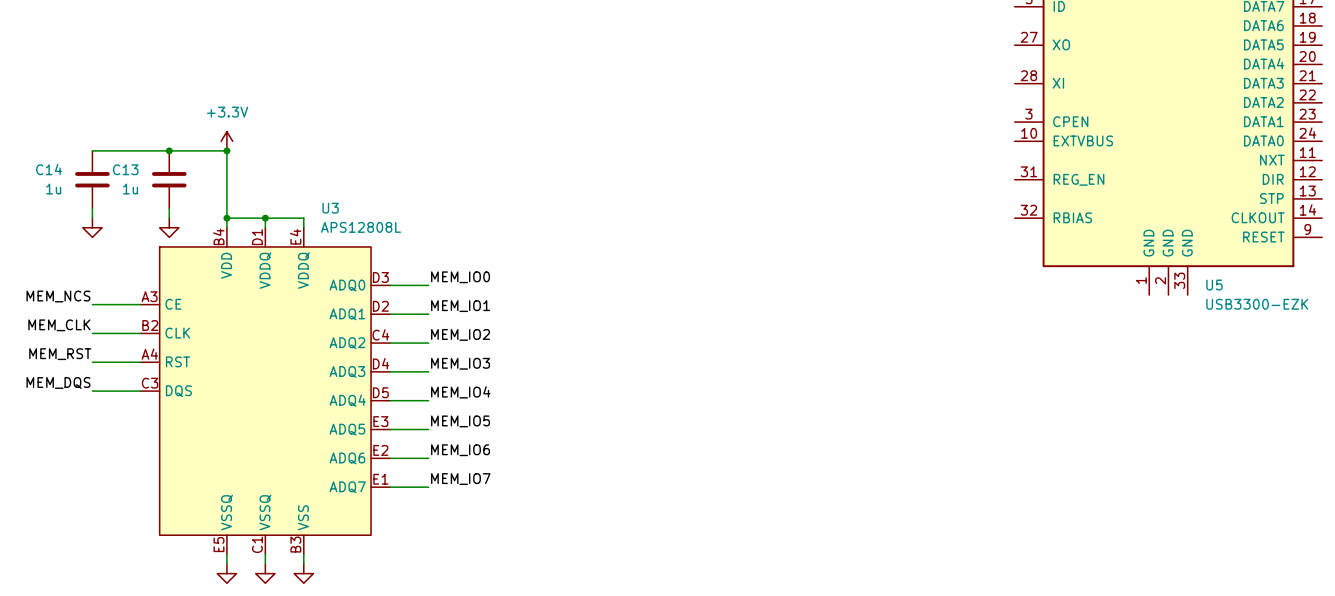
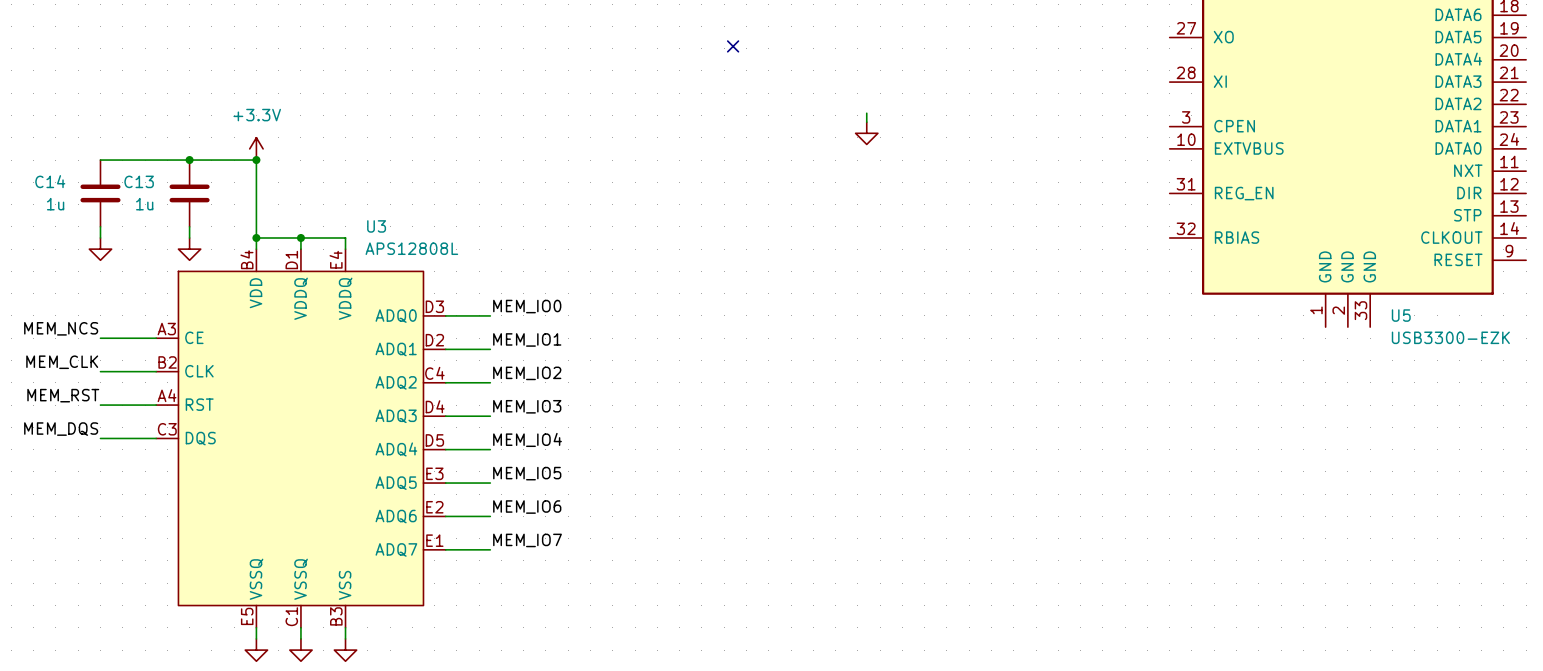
no-connect mark: none -> (733, 46)
wire: none -> (866, 113) (866, 122)
power symbol: none -> (866, 133)

